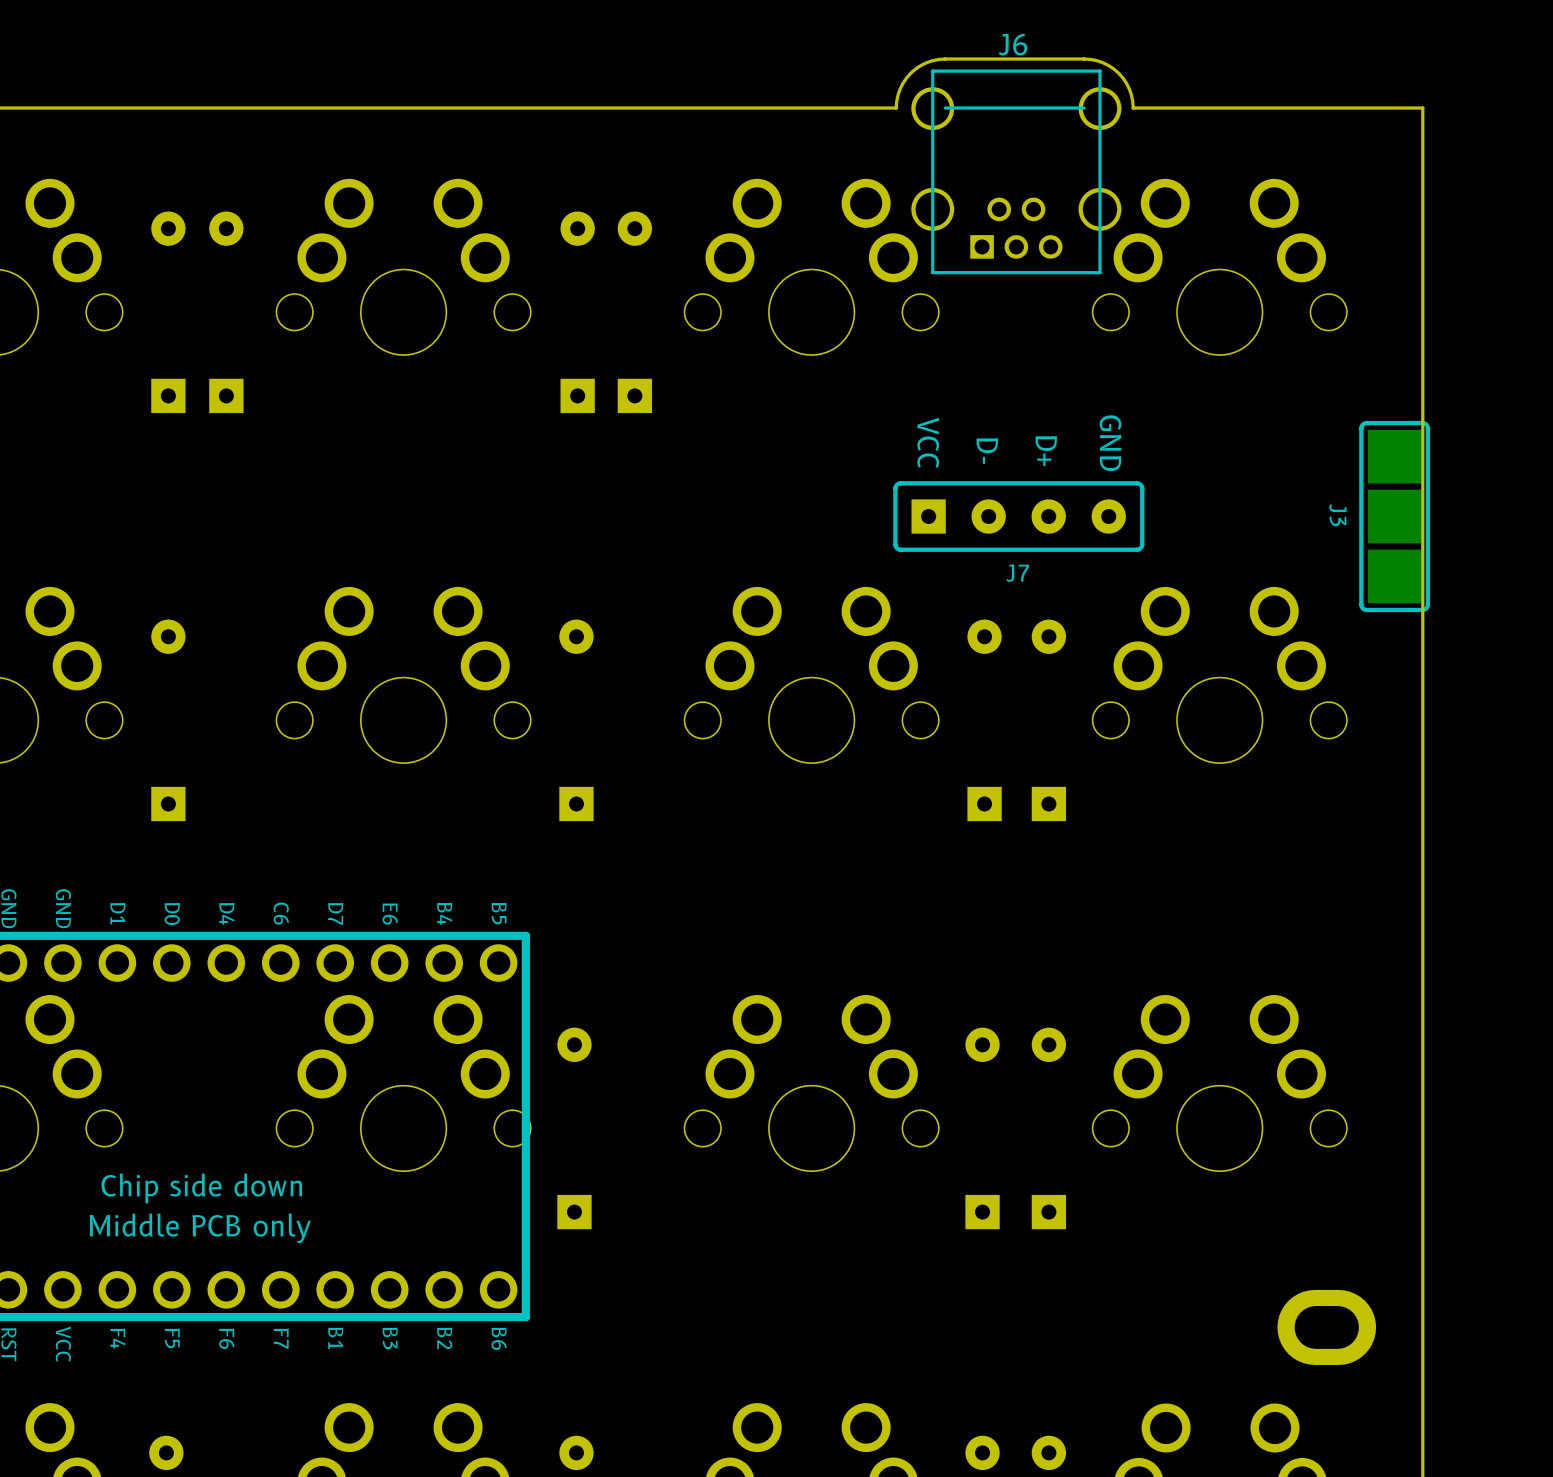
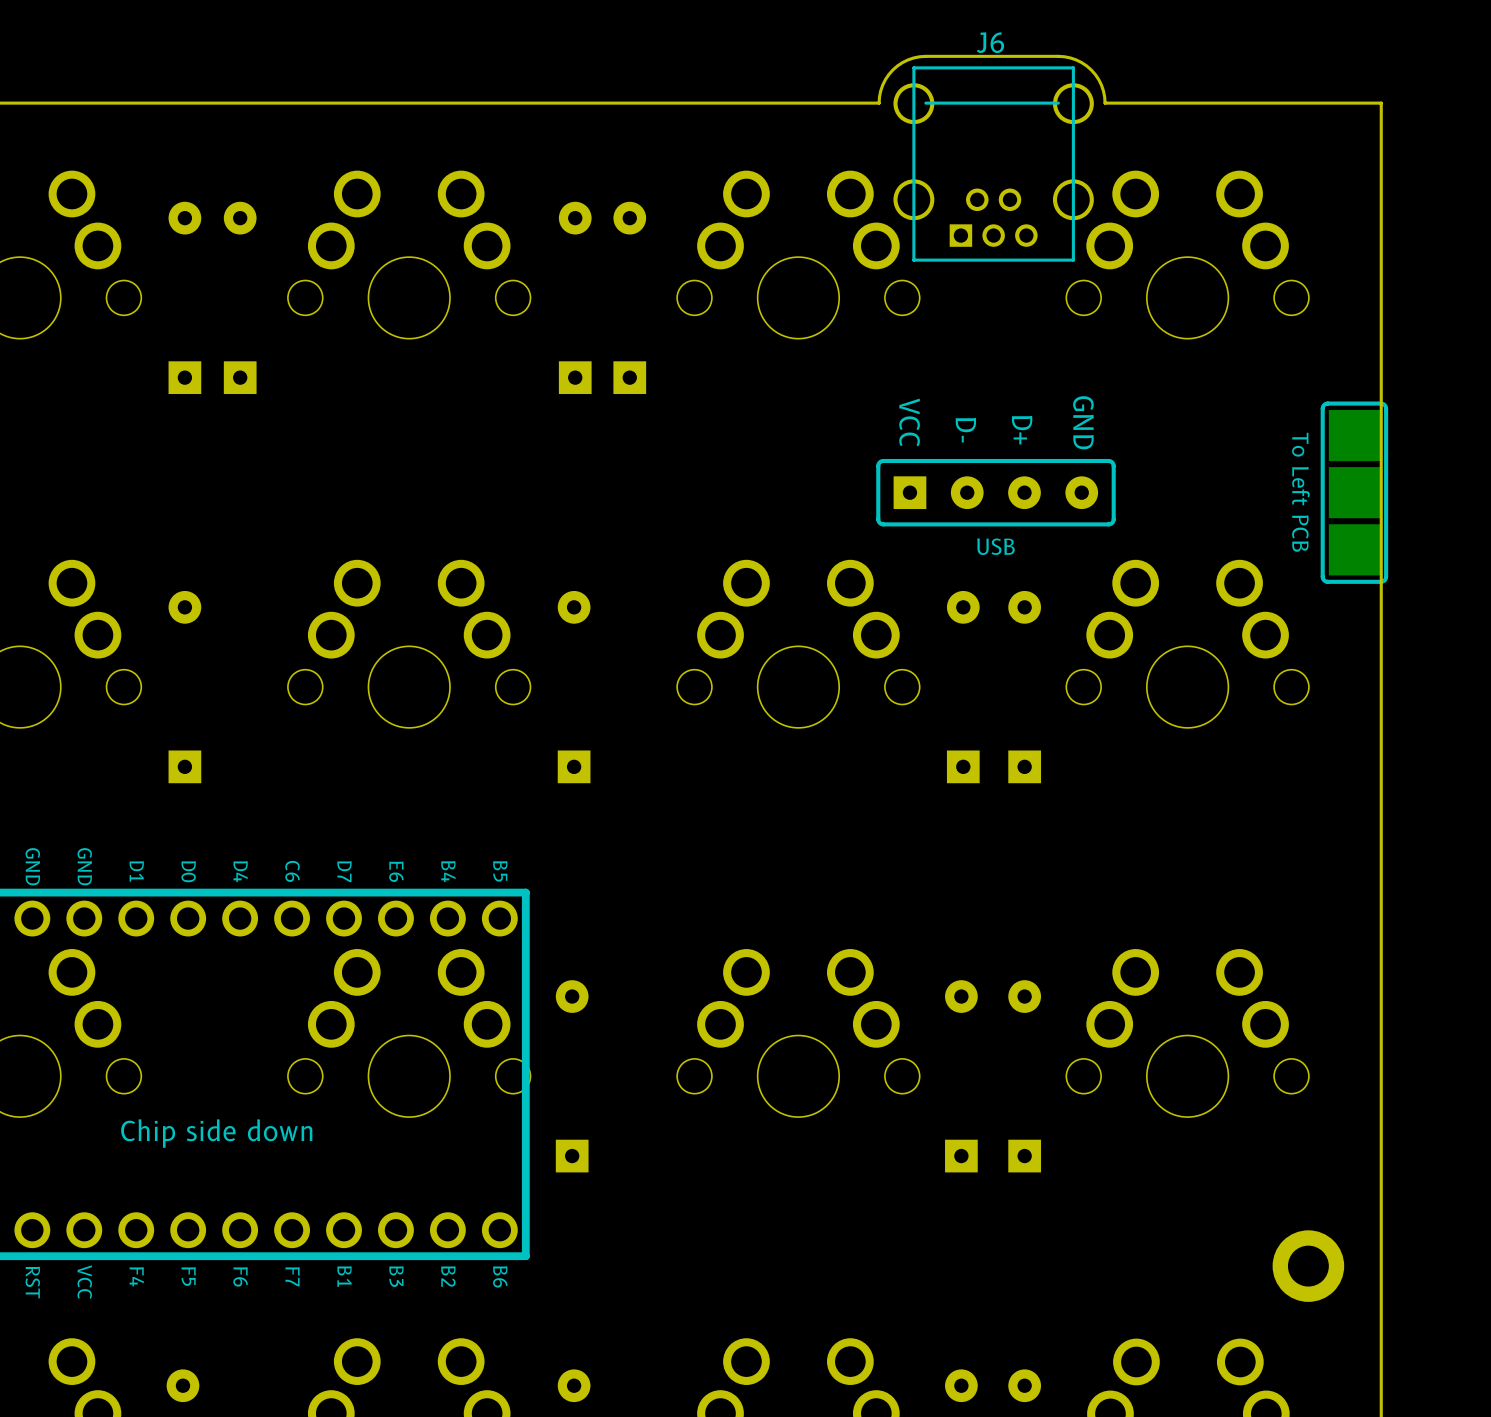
J3 name: J3 (1337, 515) -> To Left PCB (1300, 492)
J7 name: J7 (1017, 573) -> USB (995, 546)
text: Middle PCB only (200, 1228) -> none
part footprint: [1277, 1289, 1377, 1365] -> [1272, 1230, 1345, 1302]

